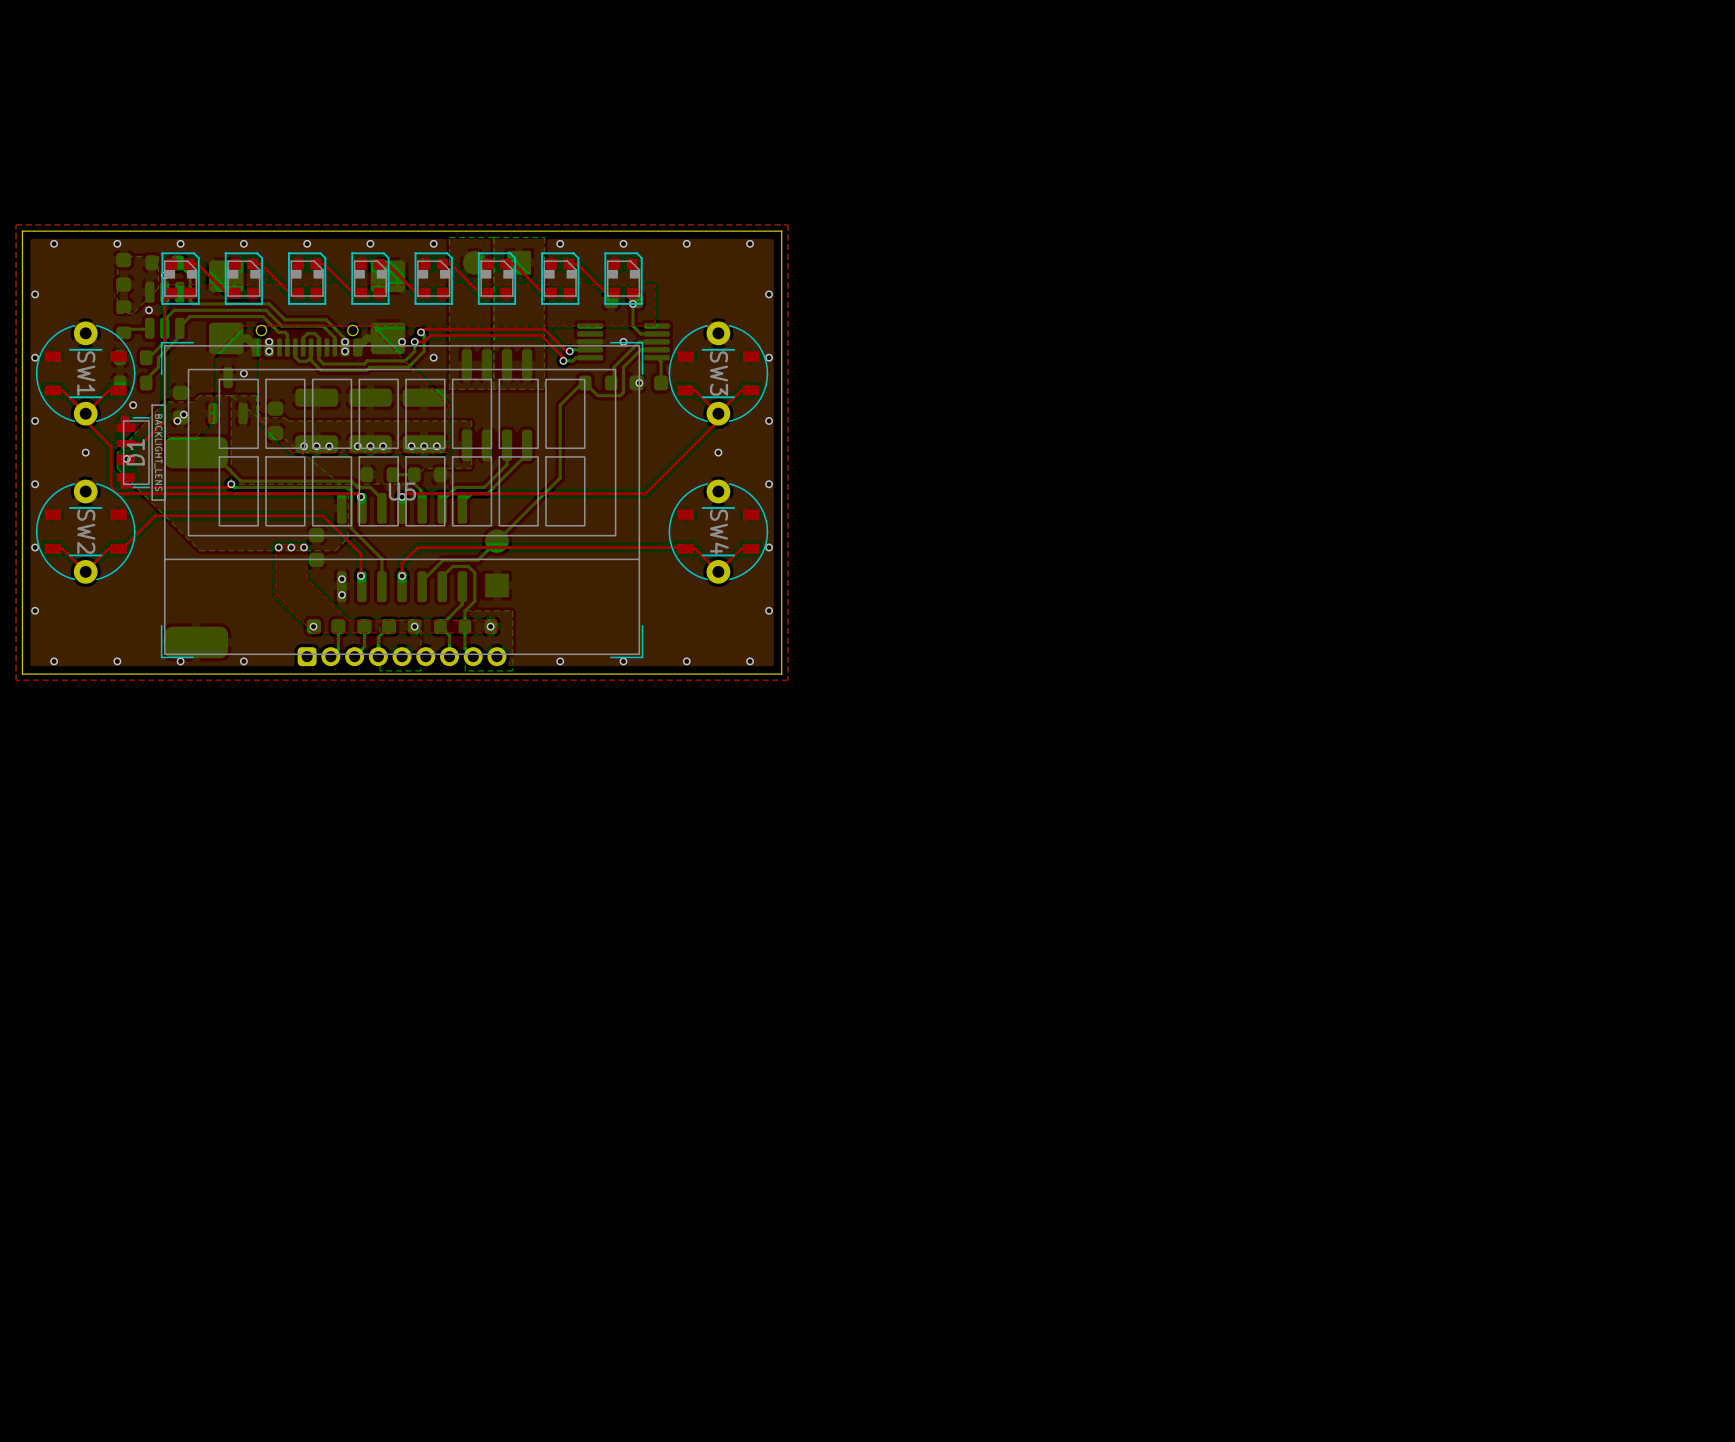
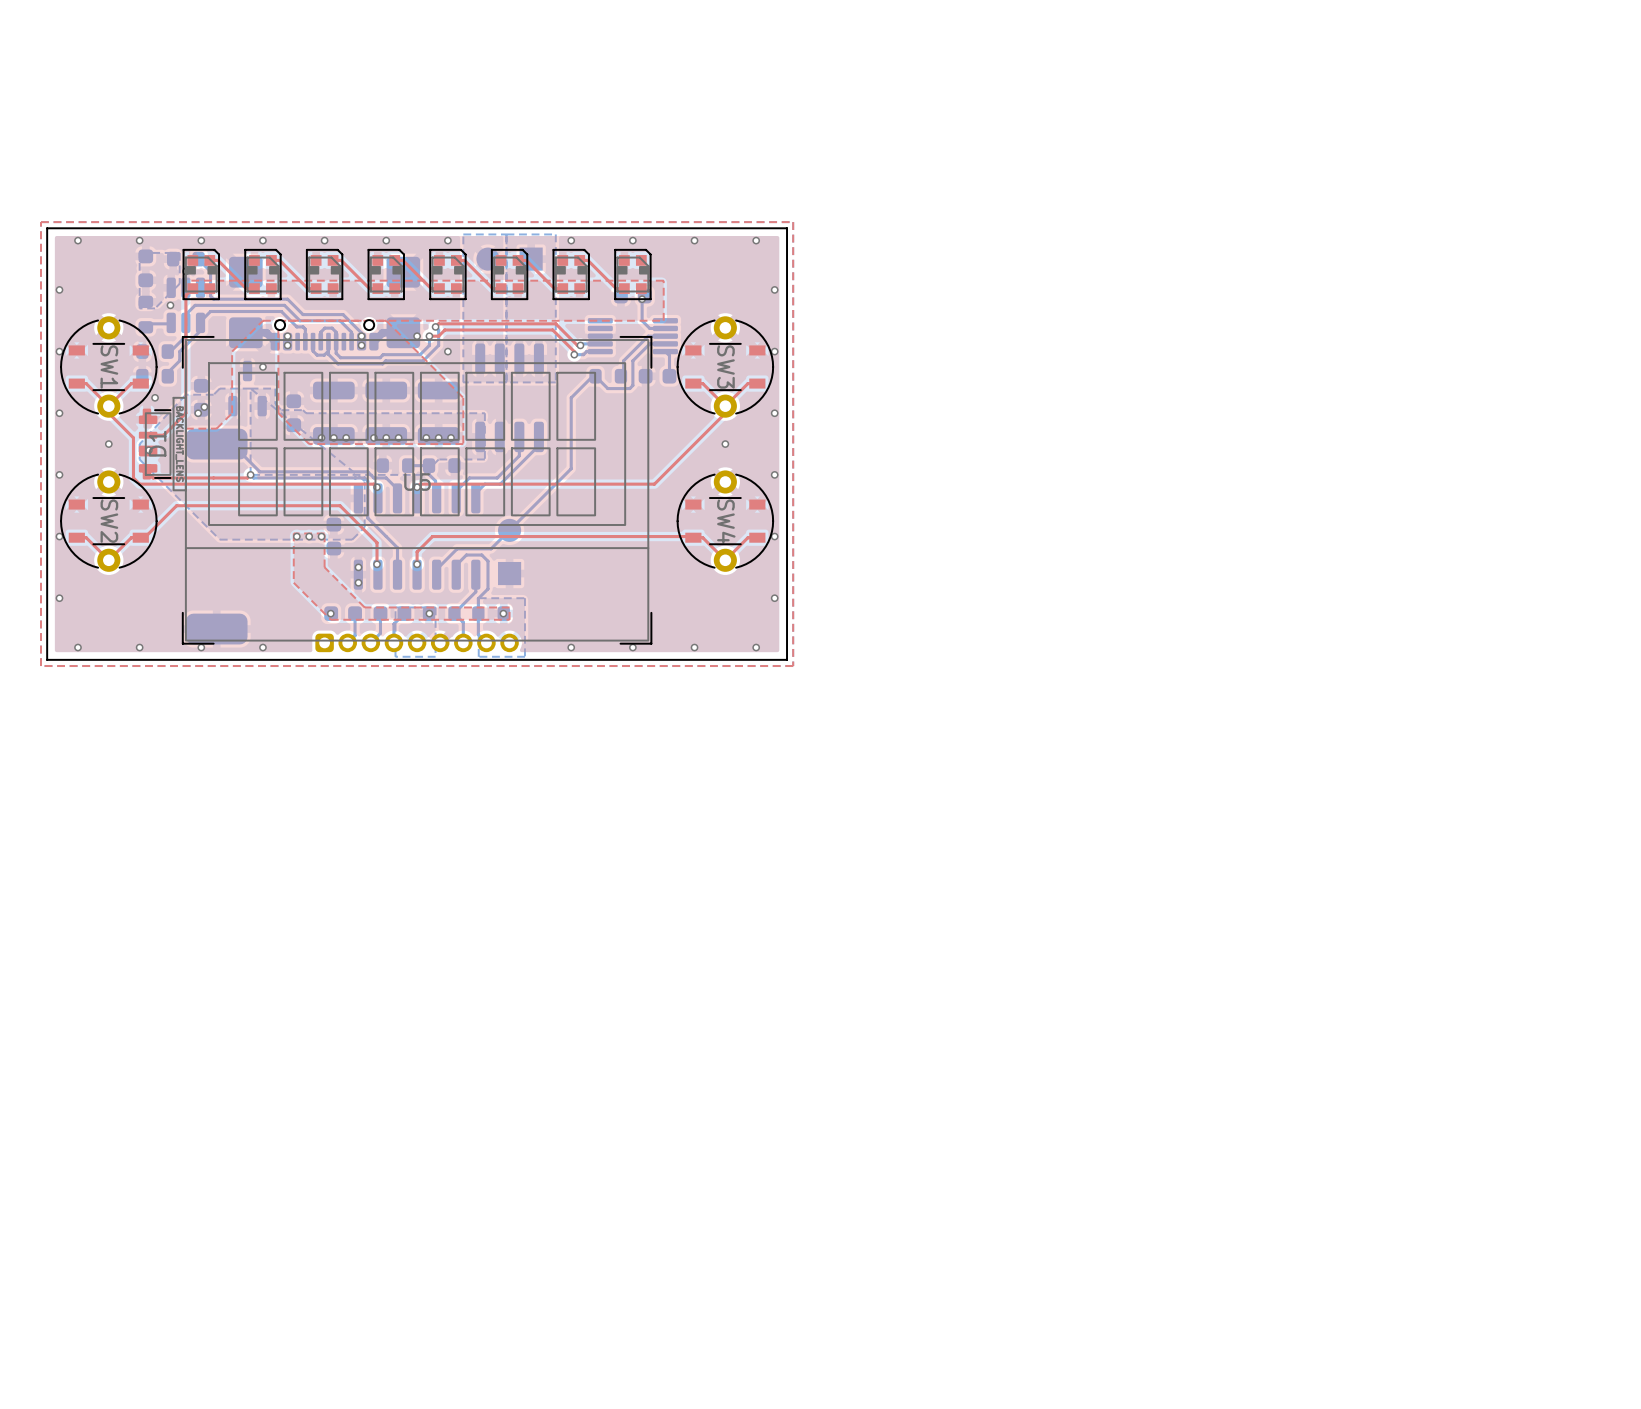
via: (623, 341) -> none
via: (639, 383) -> none

